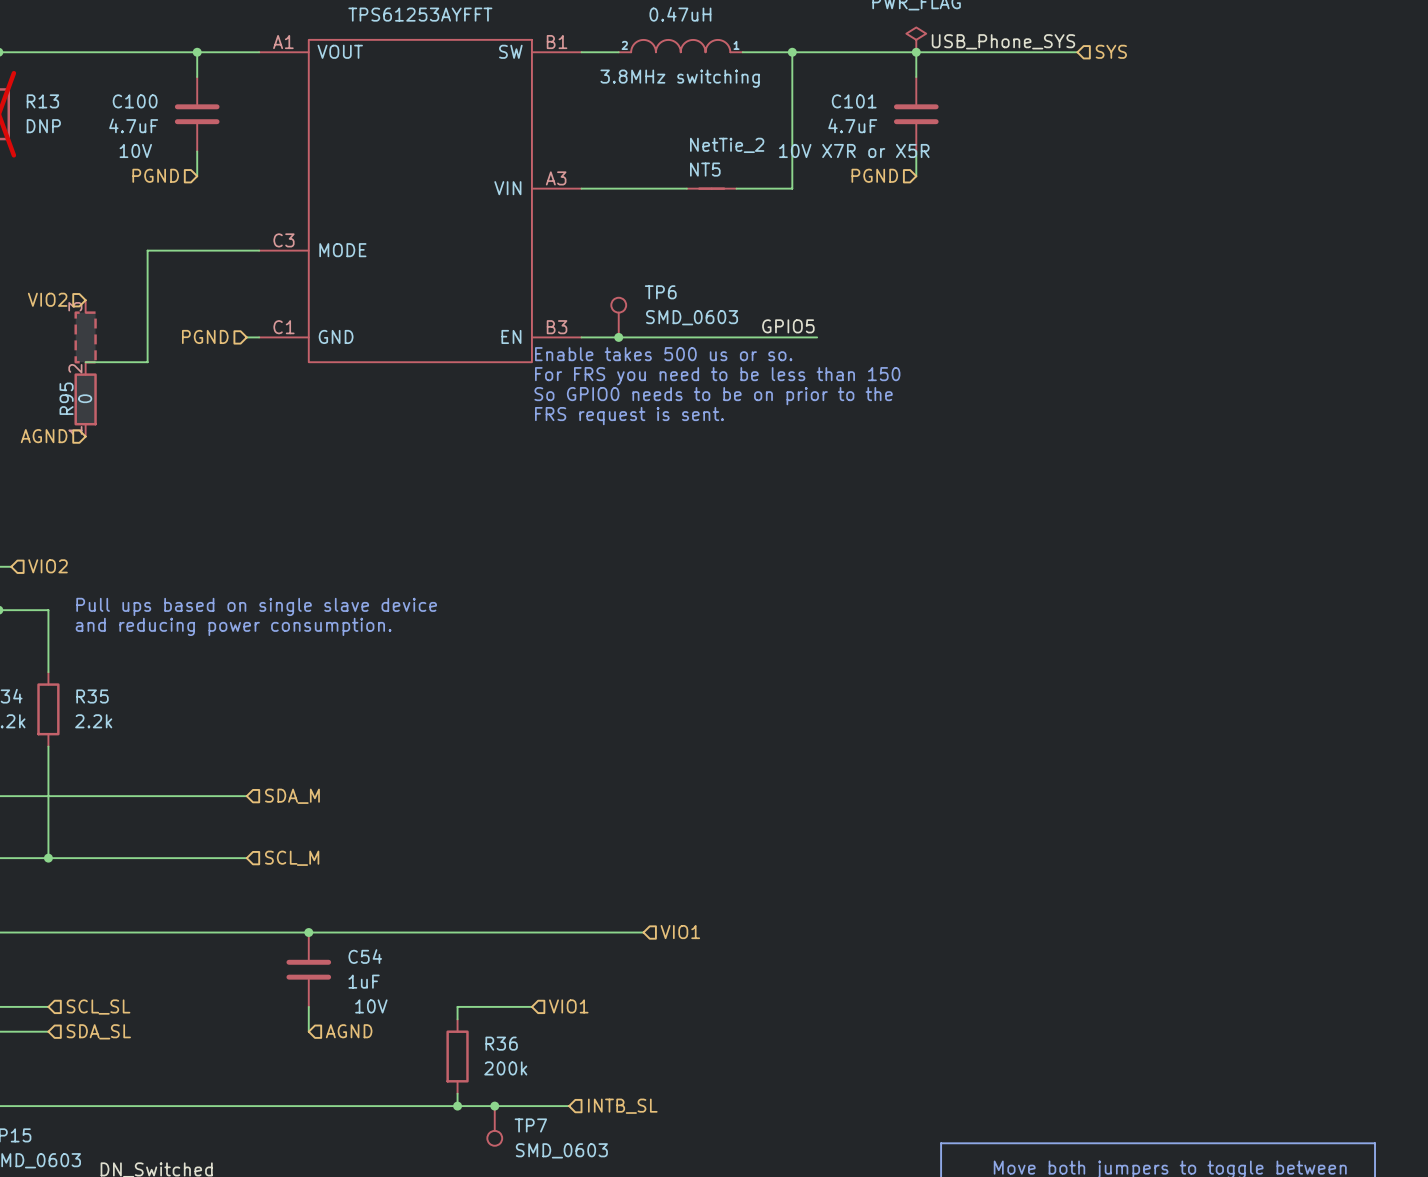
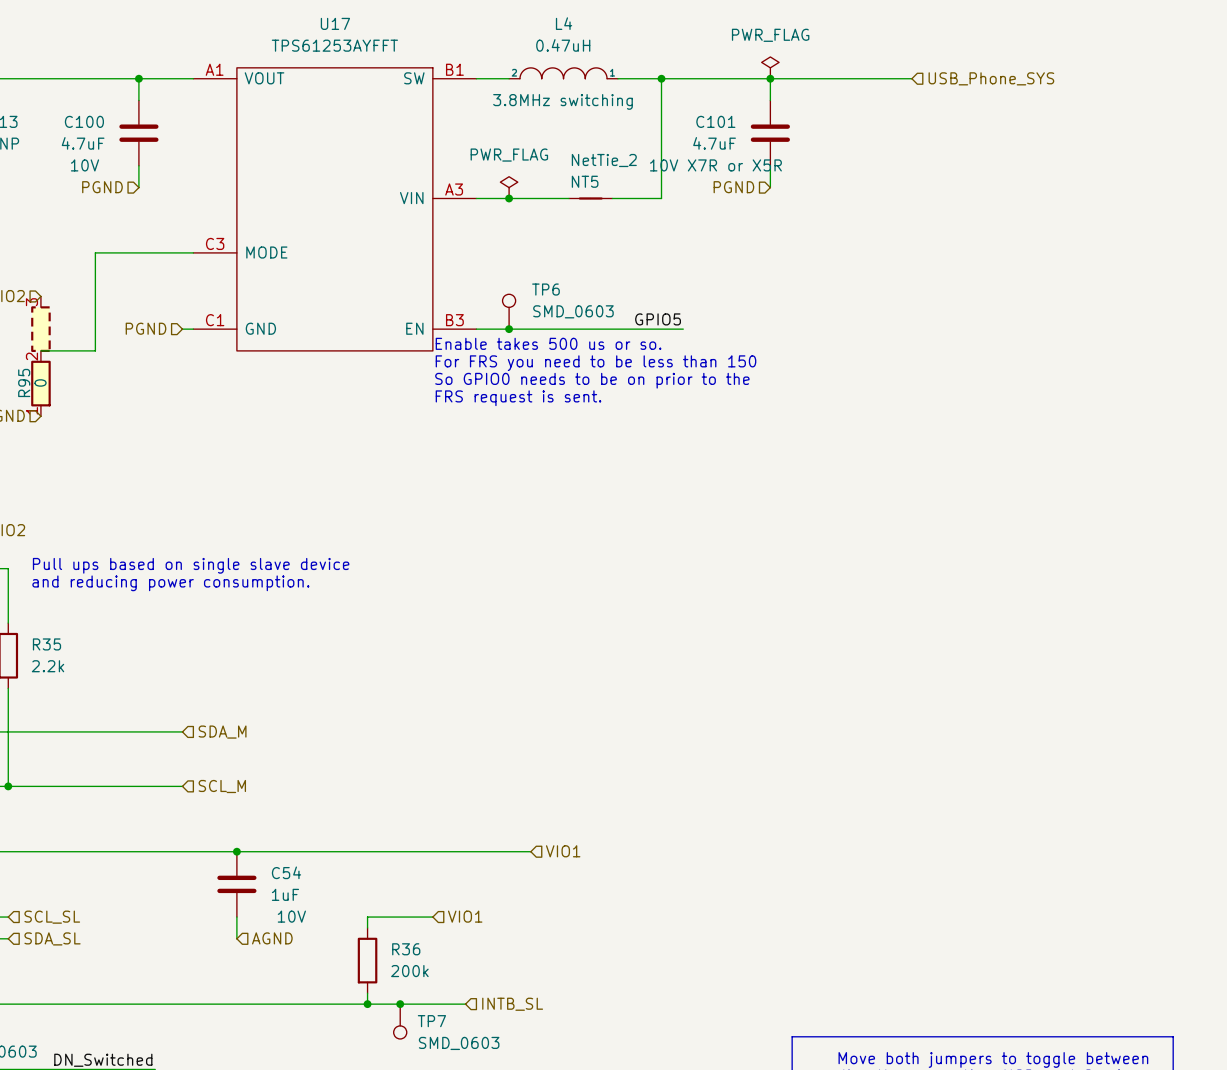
label: USB_Phone_SYS (1003, 41) -> none
hierarchical label: SYS (1111, 51) -> USB_Phone_SYS (991, 78)
power symbol: none -> PWR_FLAG (509, 187)
junction: none -> (509, 198)

